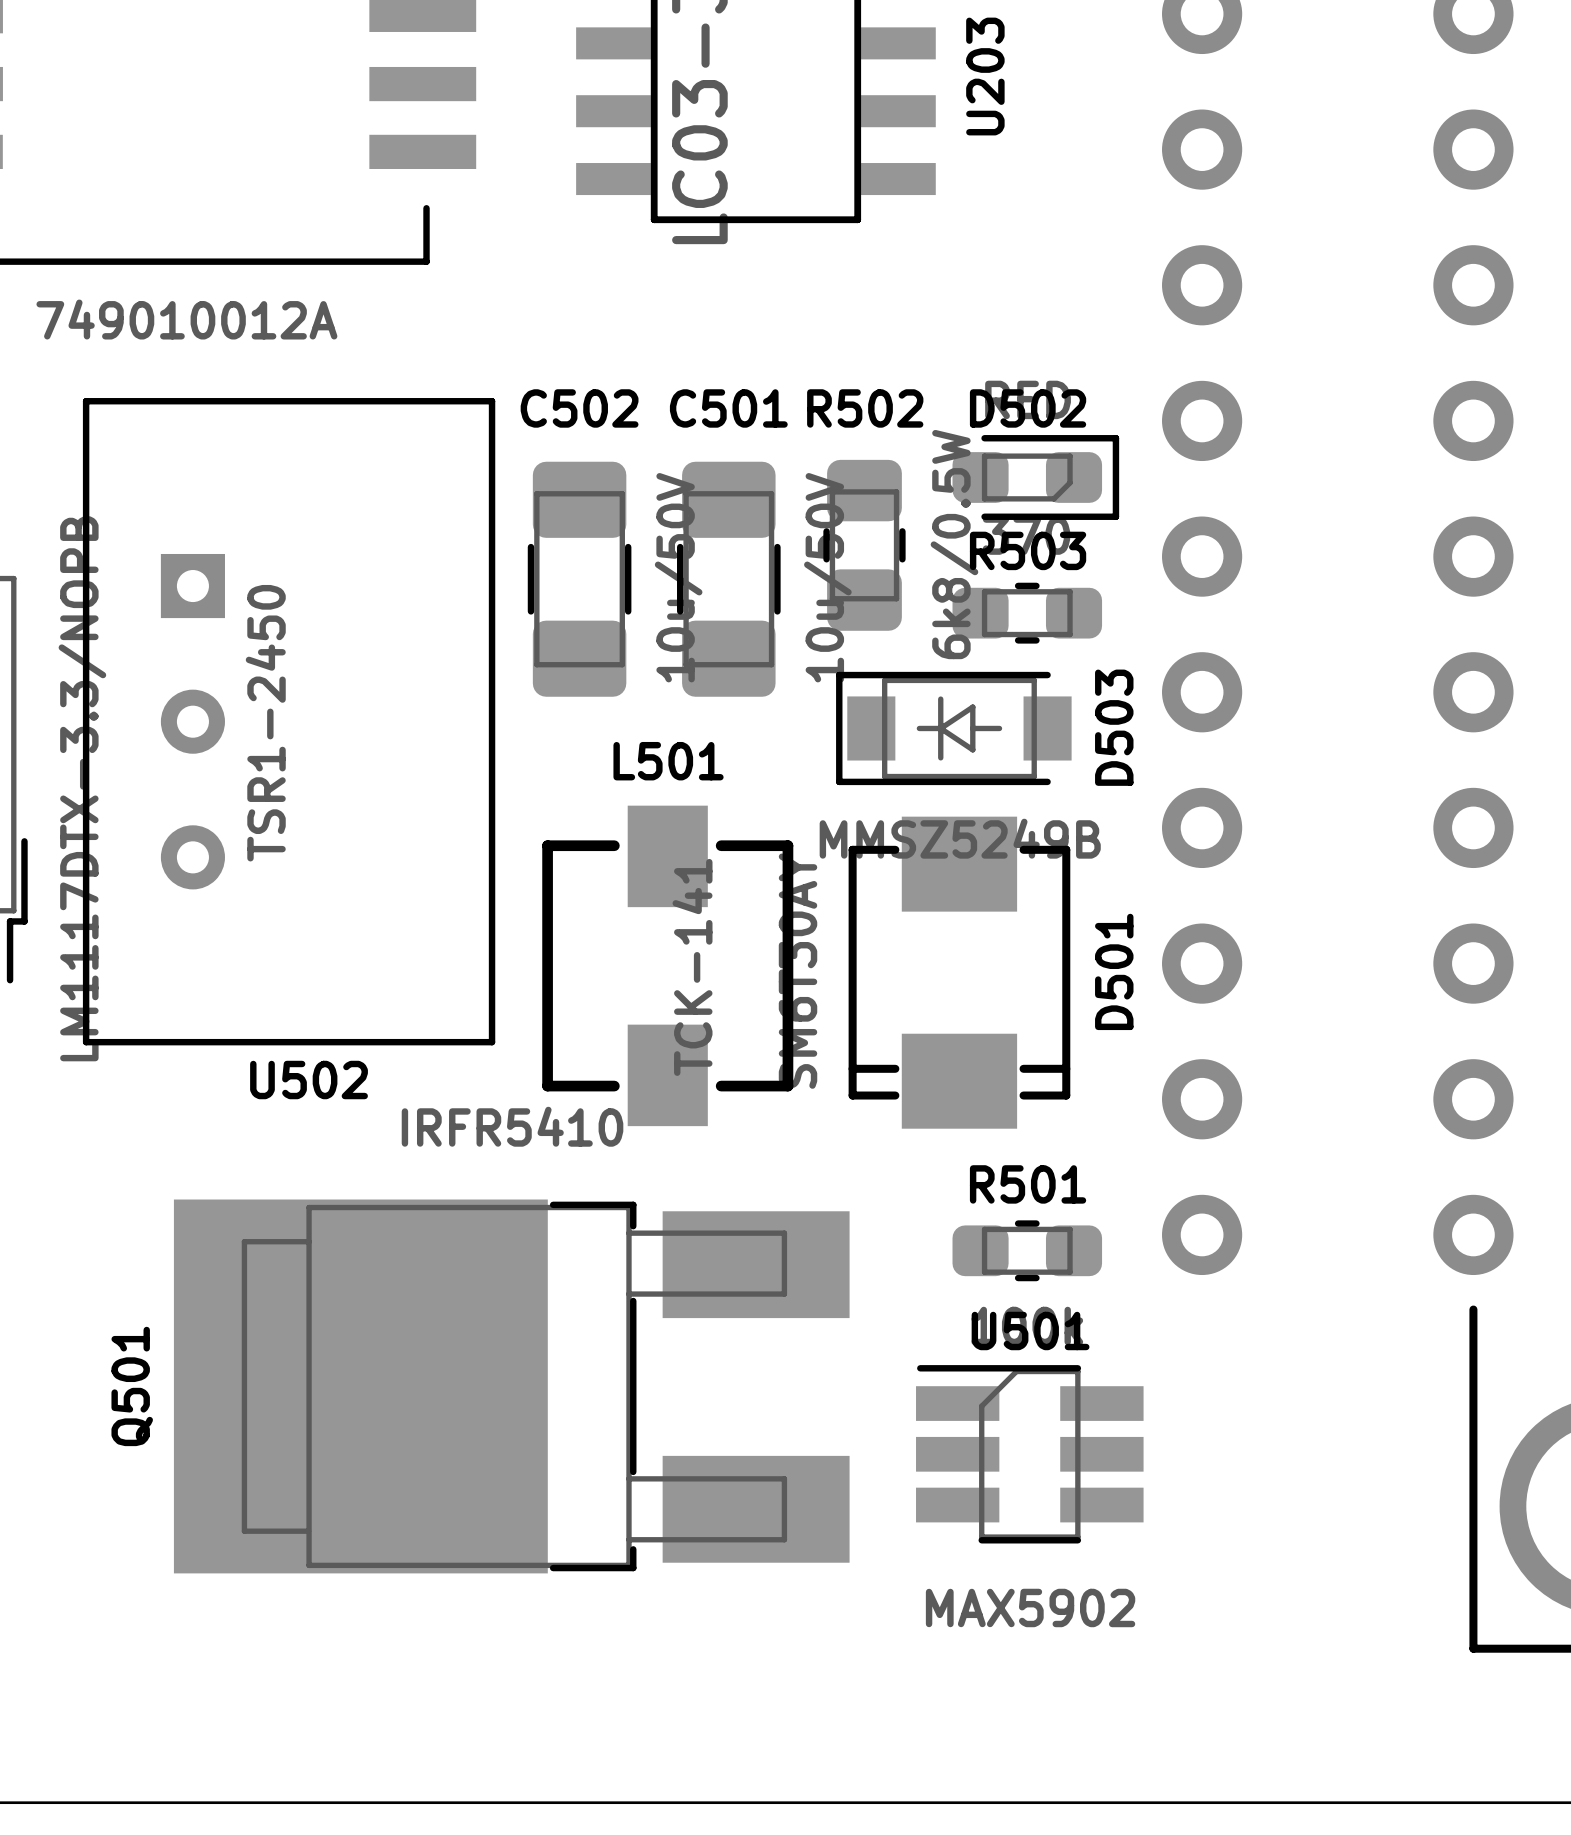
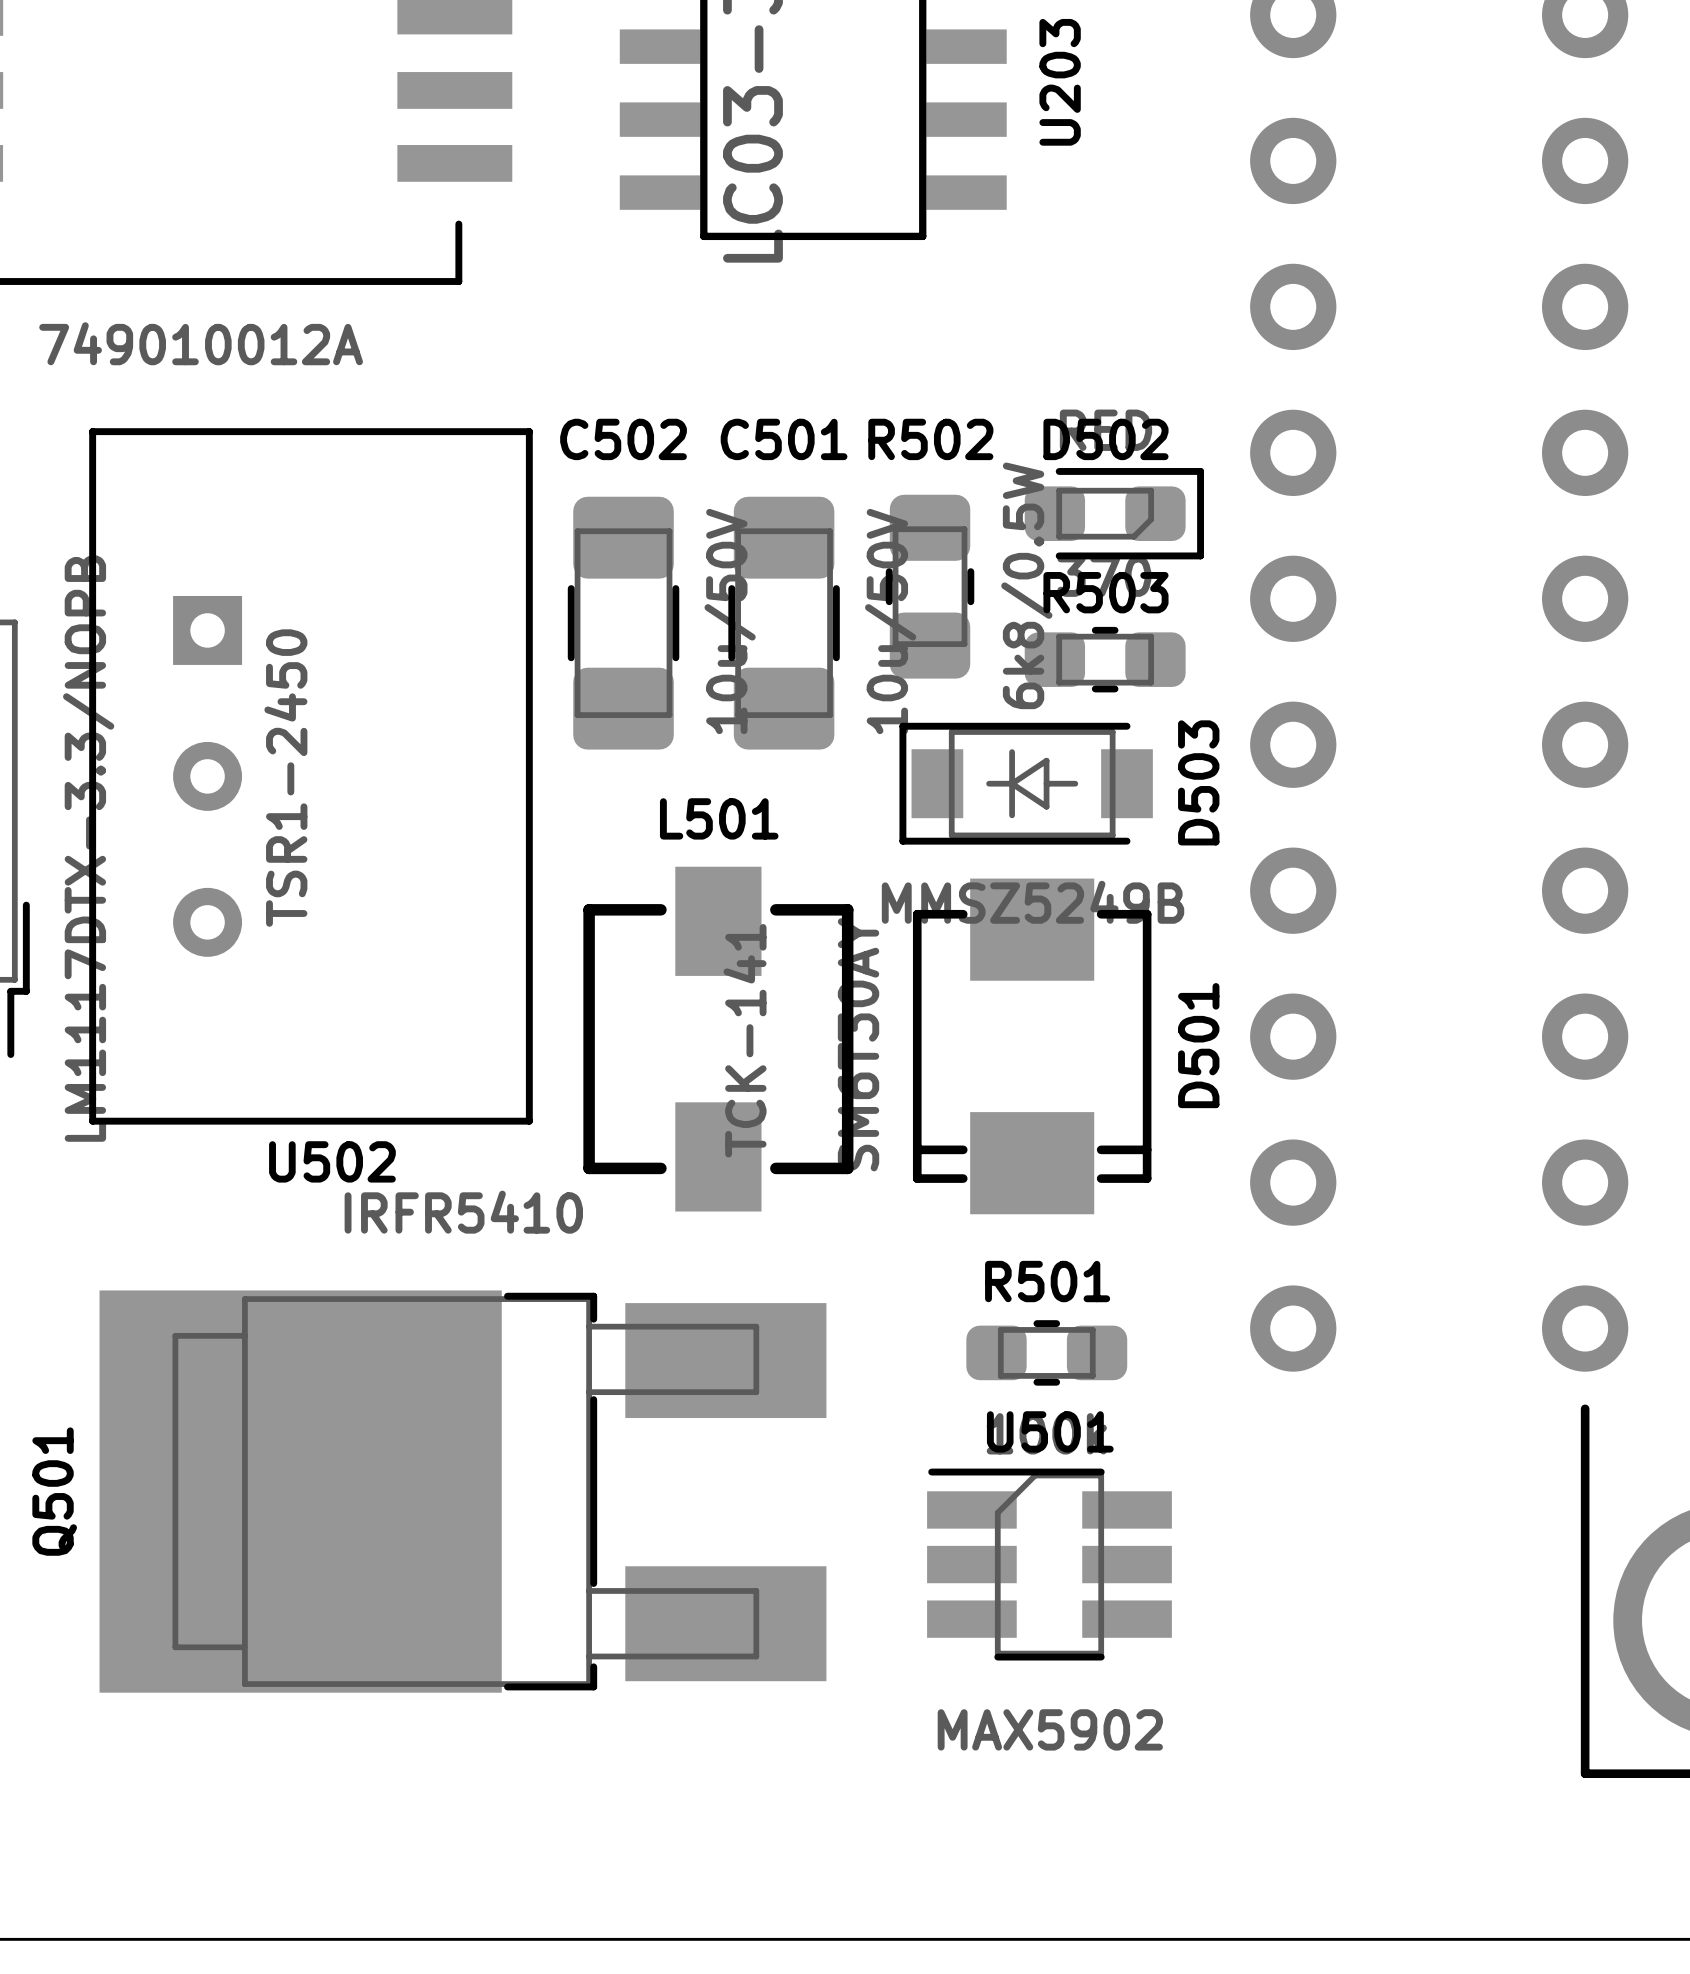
R501 position: (1027, 1250) -> (1046, 1352)
Q501 position: (511, 1386) -> (462, 1491)
U501 position: (1029, 1454) -> (1049, 1564)

